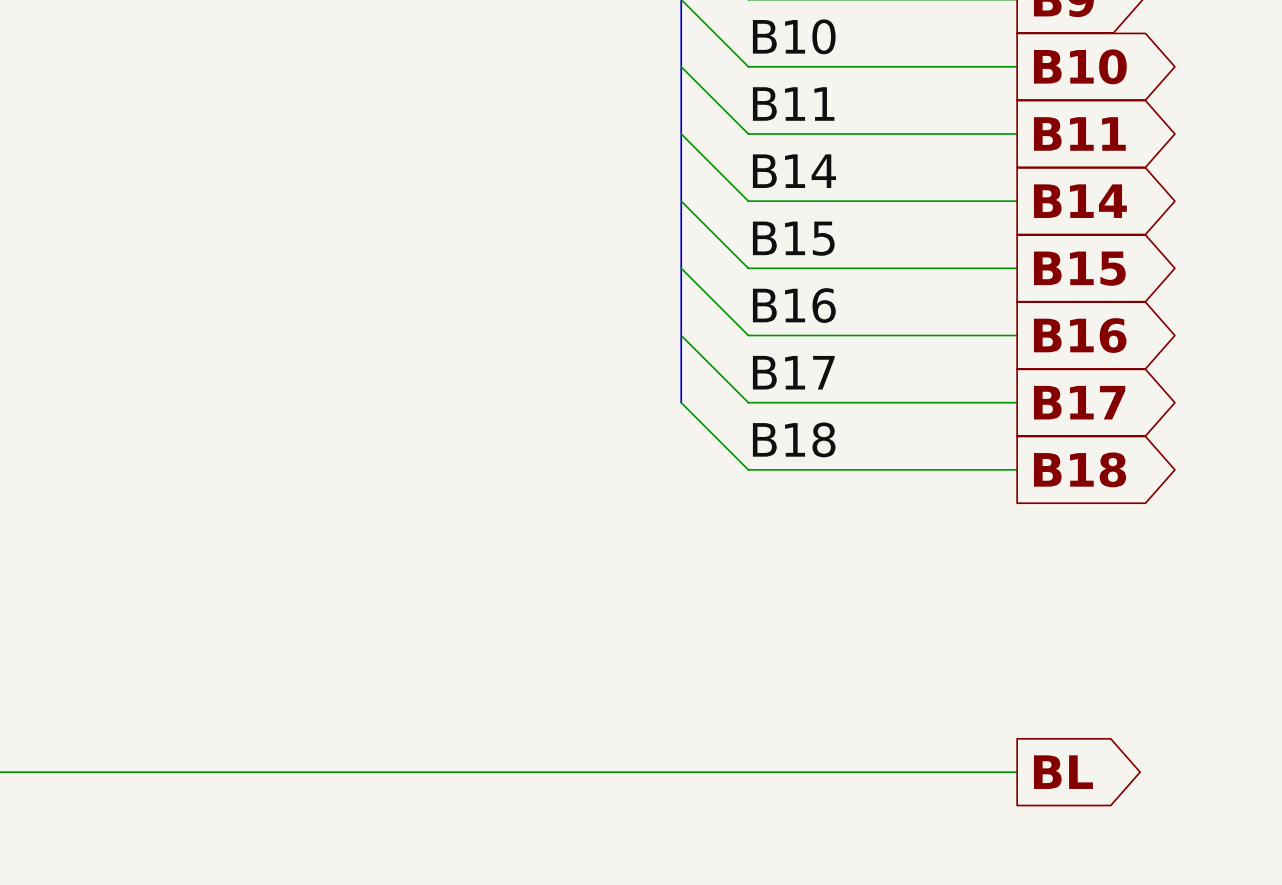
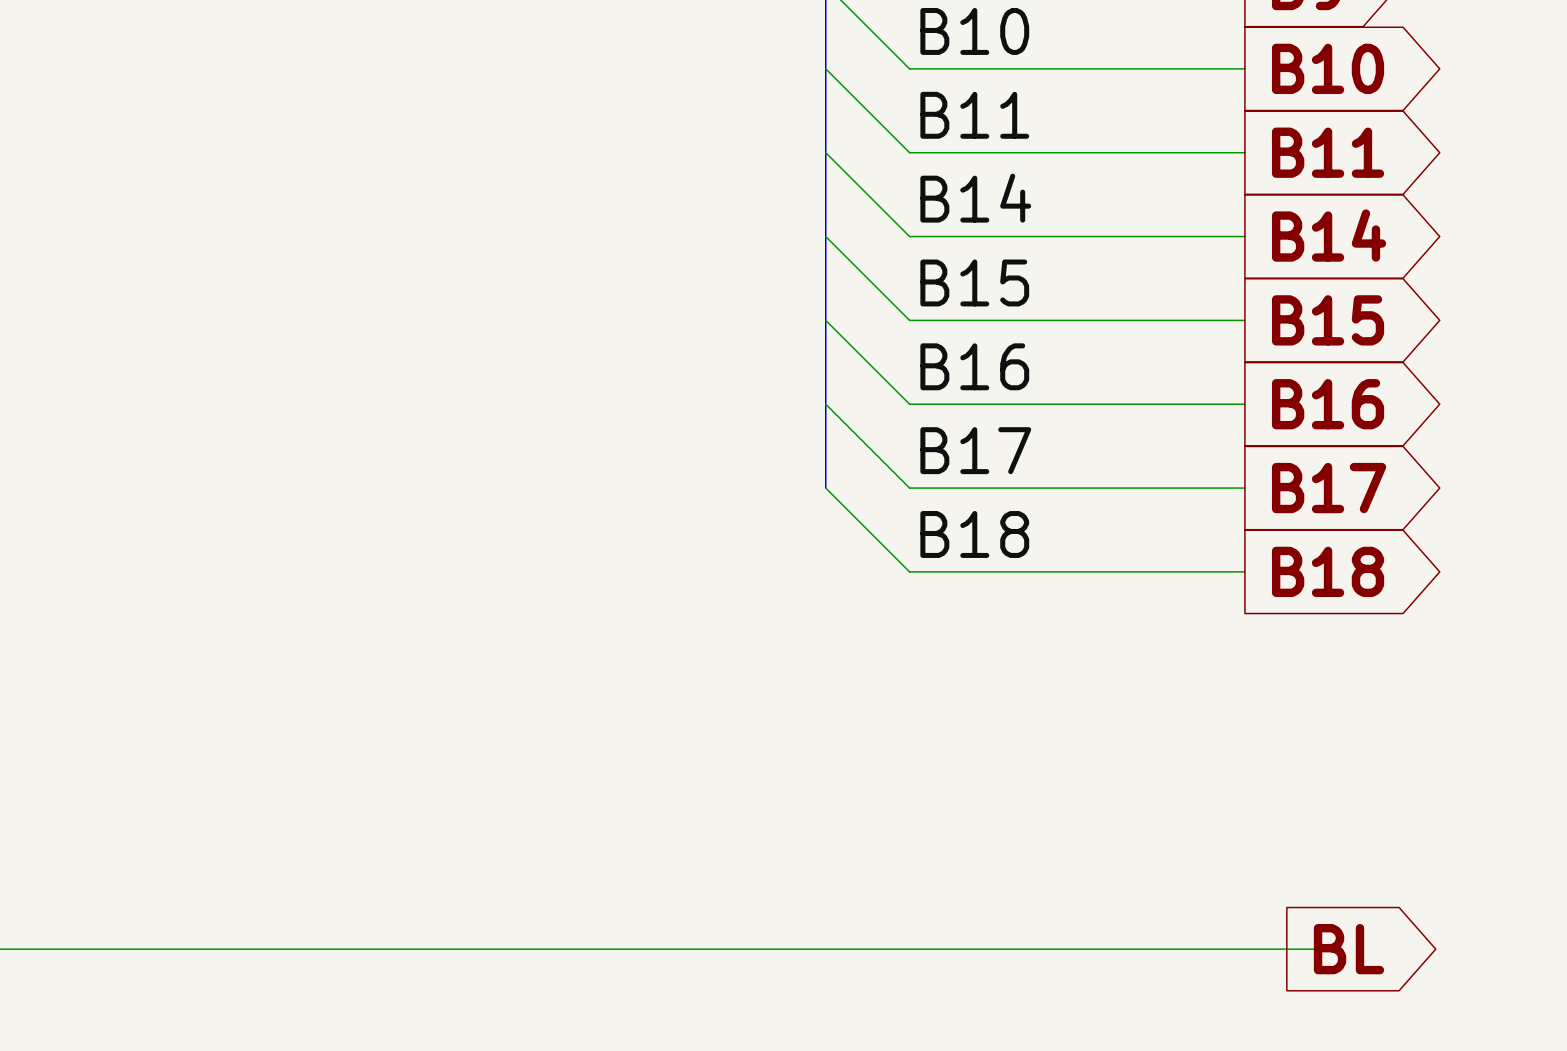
wire: none -> (1244, 949) (1328, 949)
global label position: BL (1063, 772) -> BL (1349, 949)

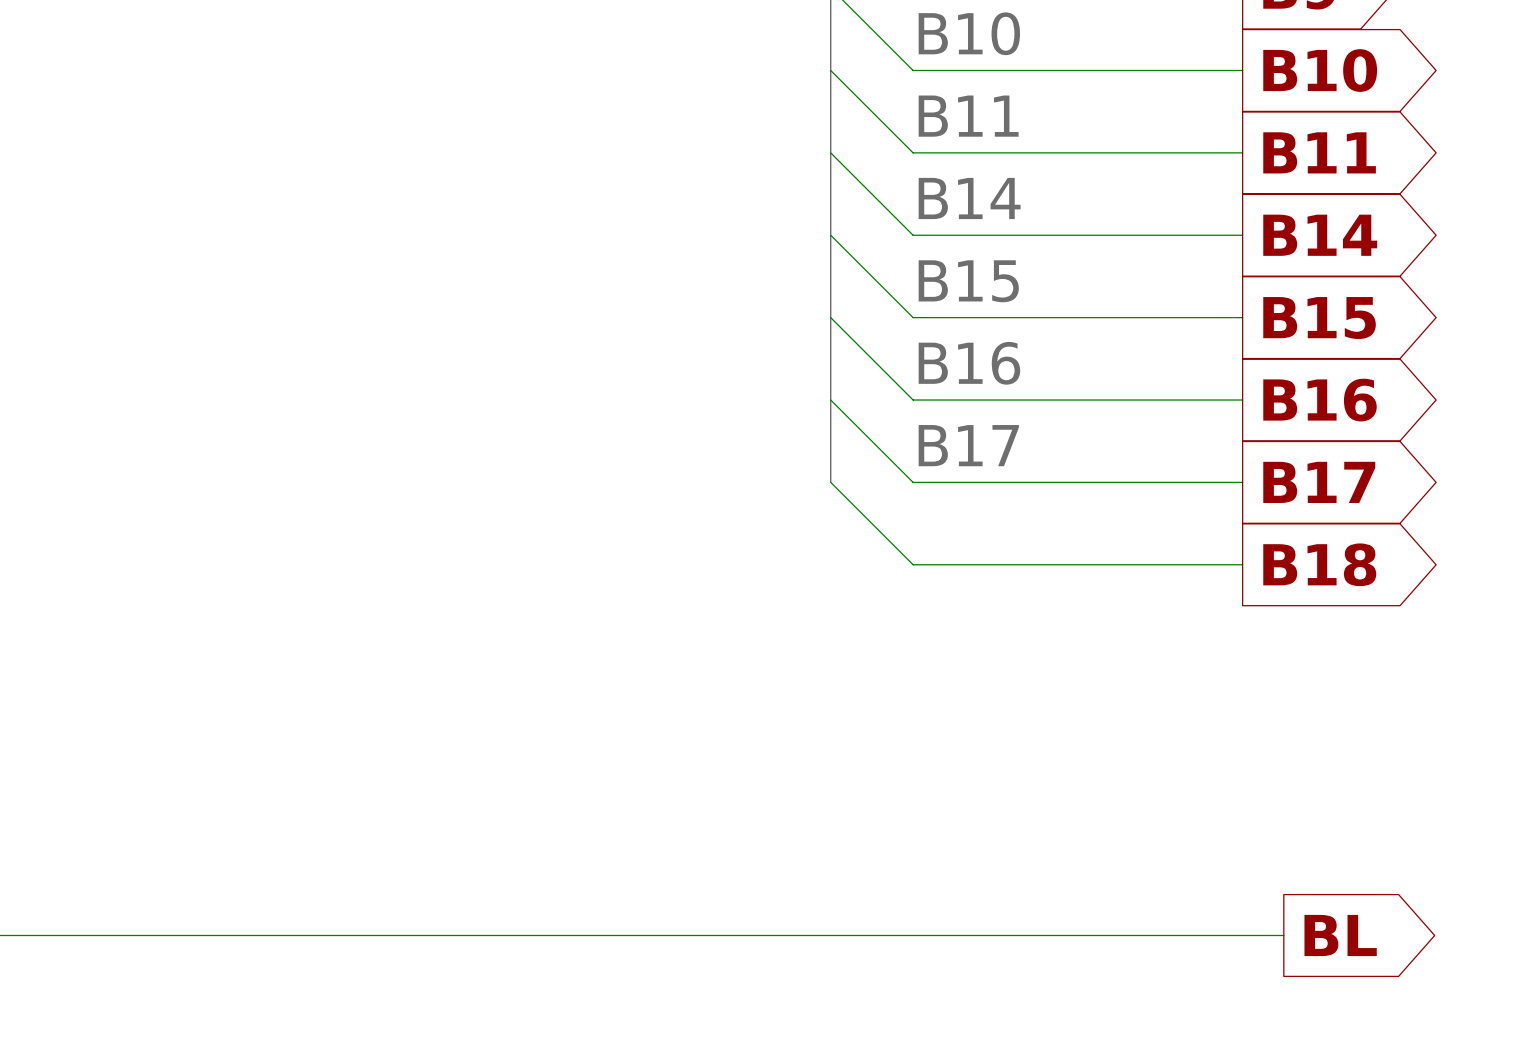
label: B18 (974, 534) -> none
wire: (1286, 949) (1328, 949) -> none

